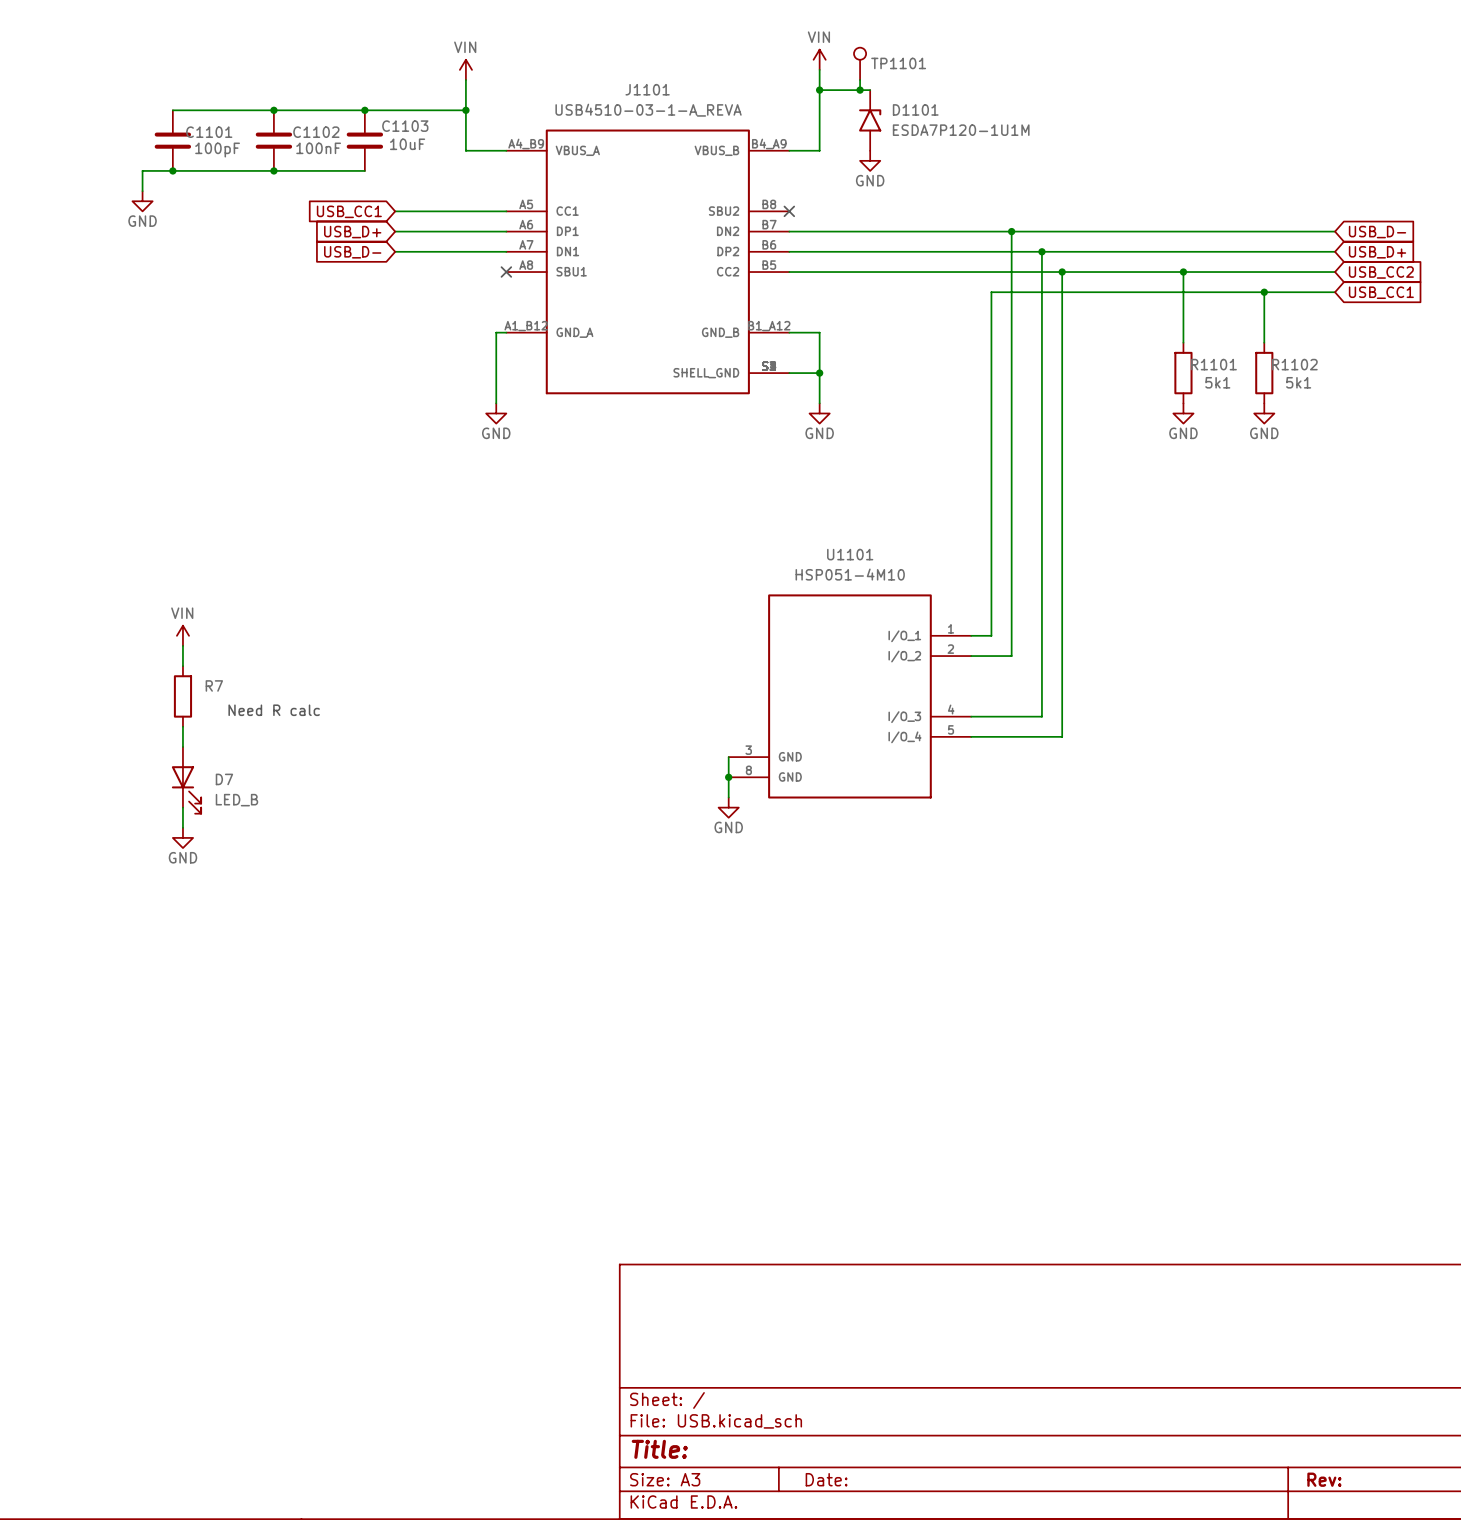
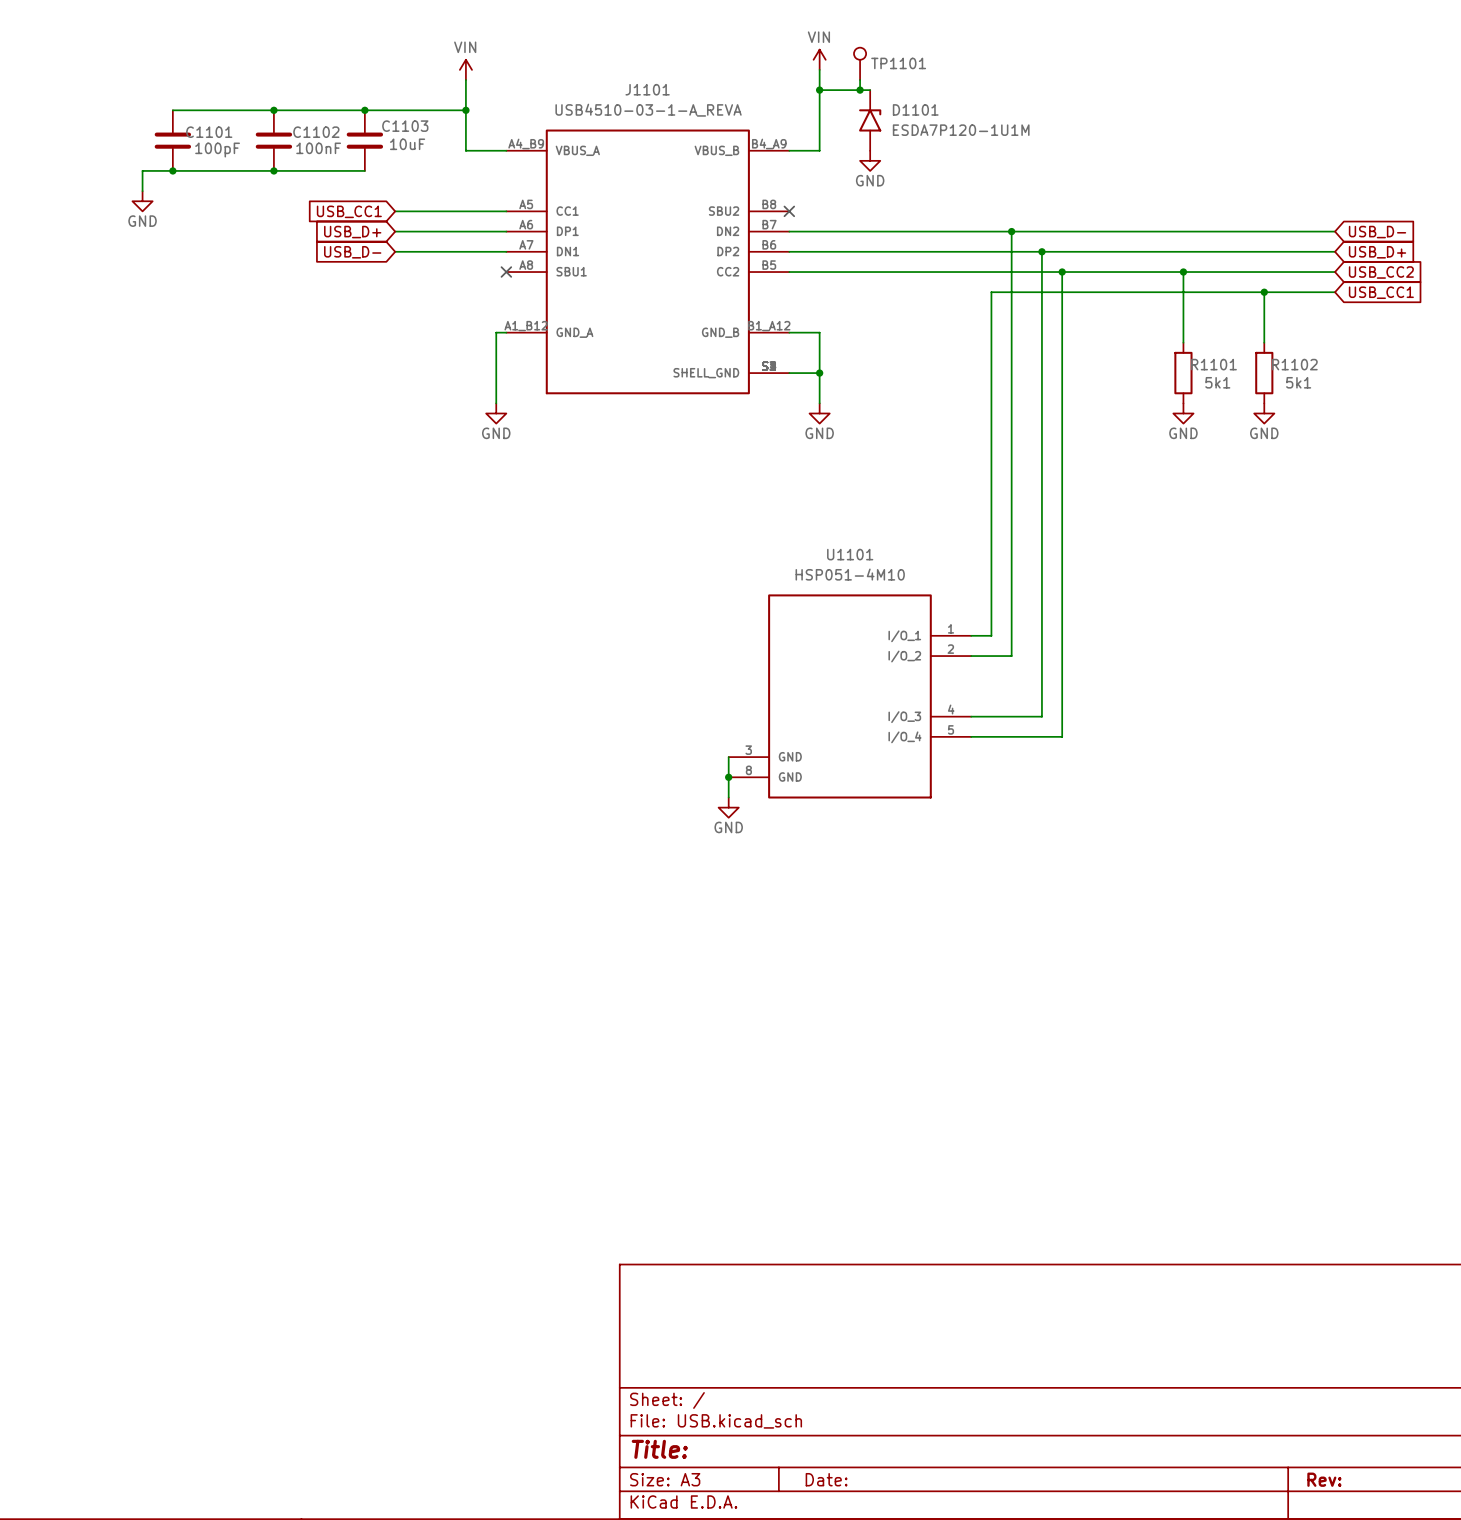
power symbol: VIN (182, 635) -> none
wire: (182, 645) (182, 666) -> none
R7: (182, 696) -> none
text: Need R calc (274, 710) -> none
wire: (182, 726) (182, 746) -> none
D7: LED_B (186, 780) -> none
wire: (182, 807) (182, 827) -> none
power symbol: GND (182, 837) -> none

